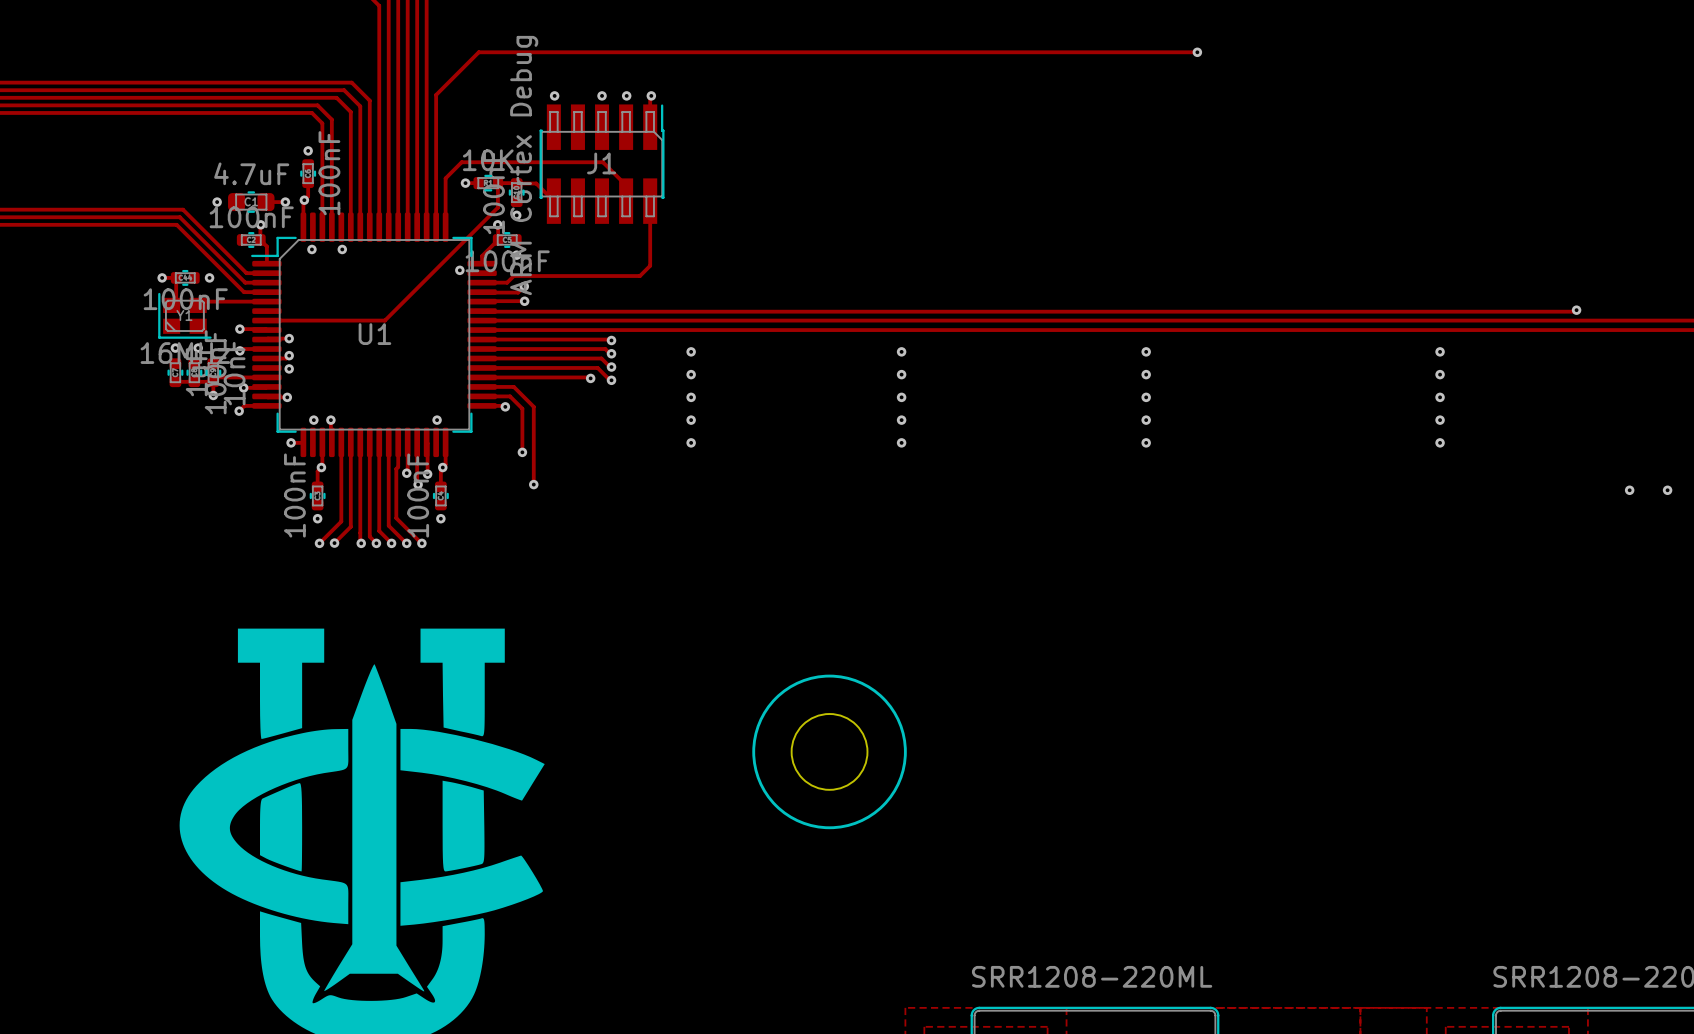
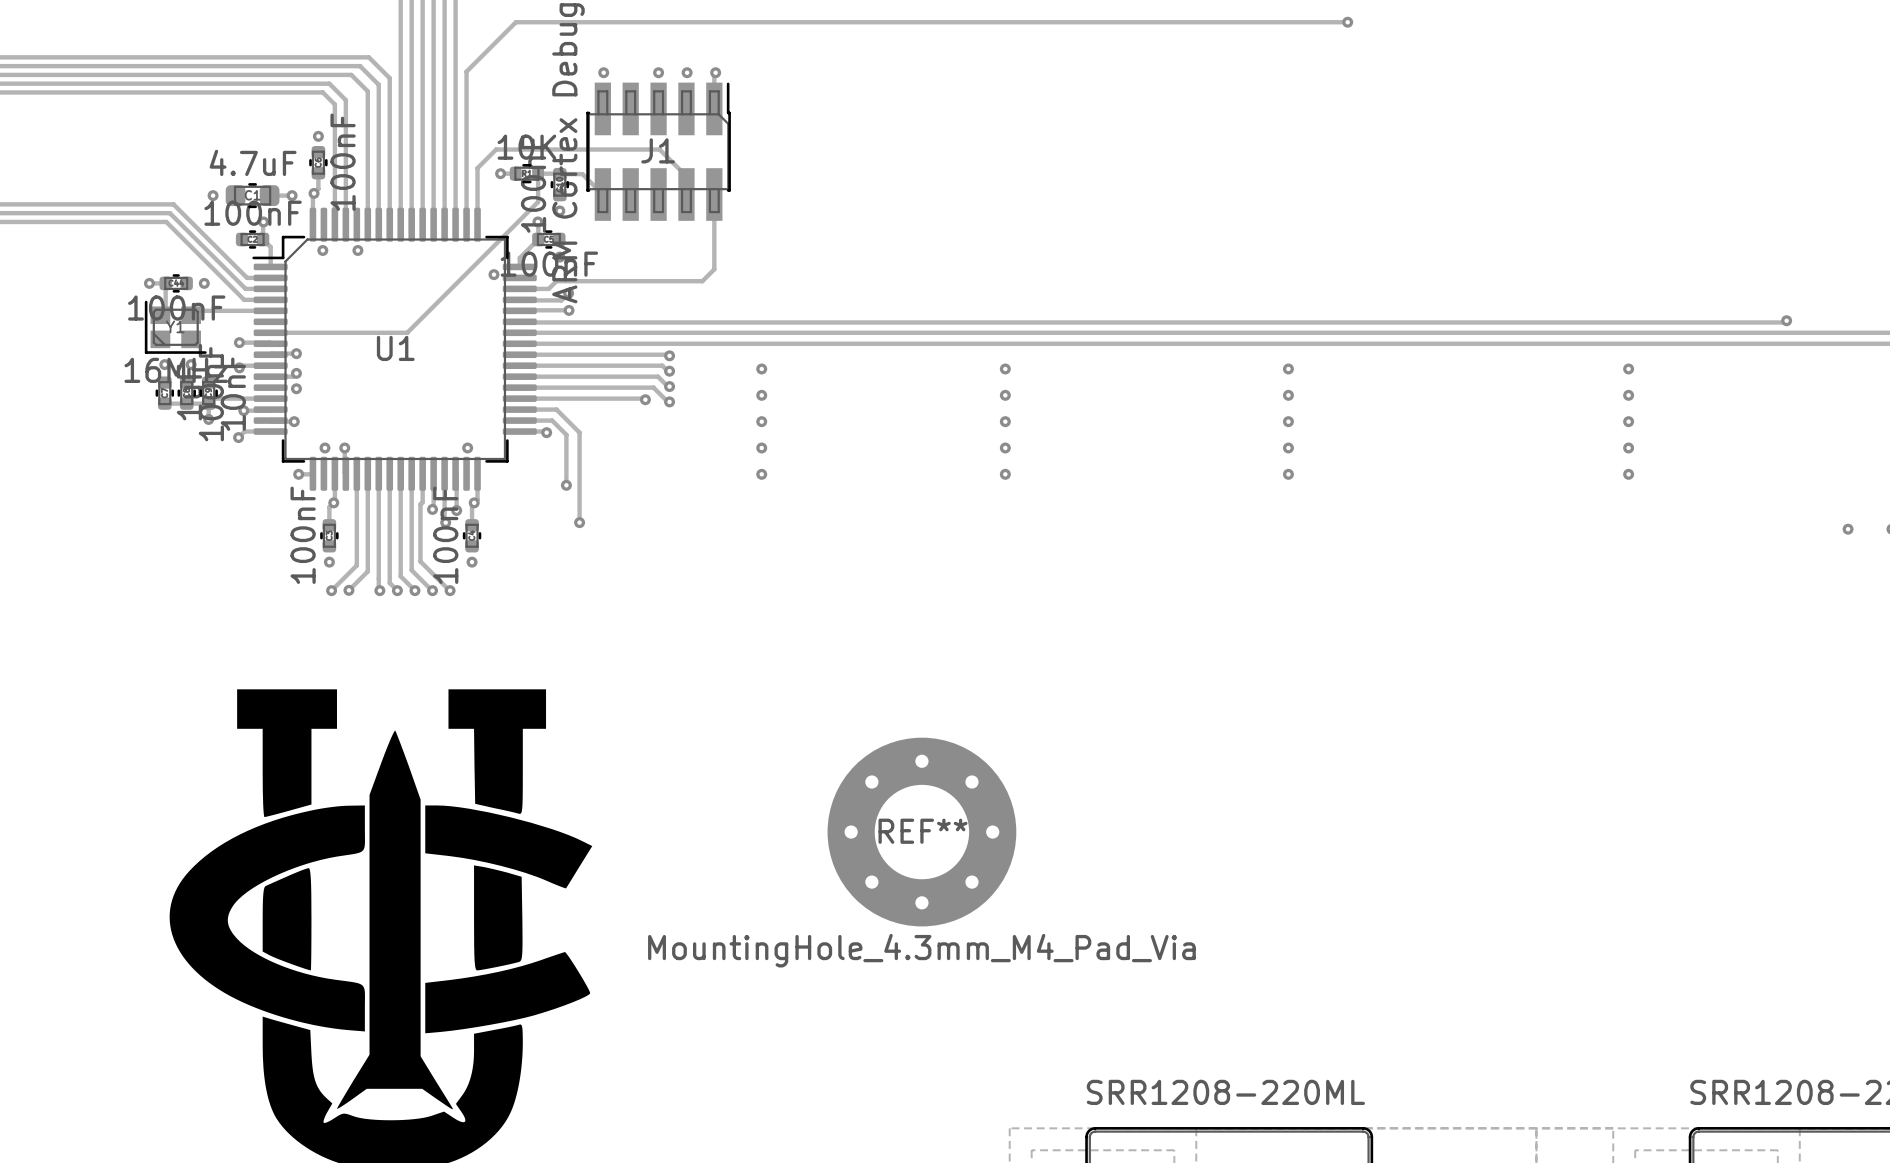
drawing: [752, 674, 907, 830] -> none
round board edge: [790, 713, 869, 791] -> none
REF**: none -> MountingHole_4.3mm_M4_Pad_Via (921, 832)

